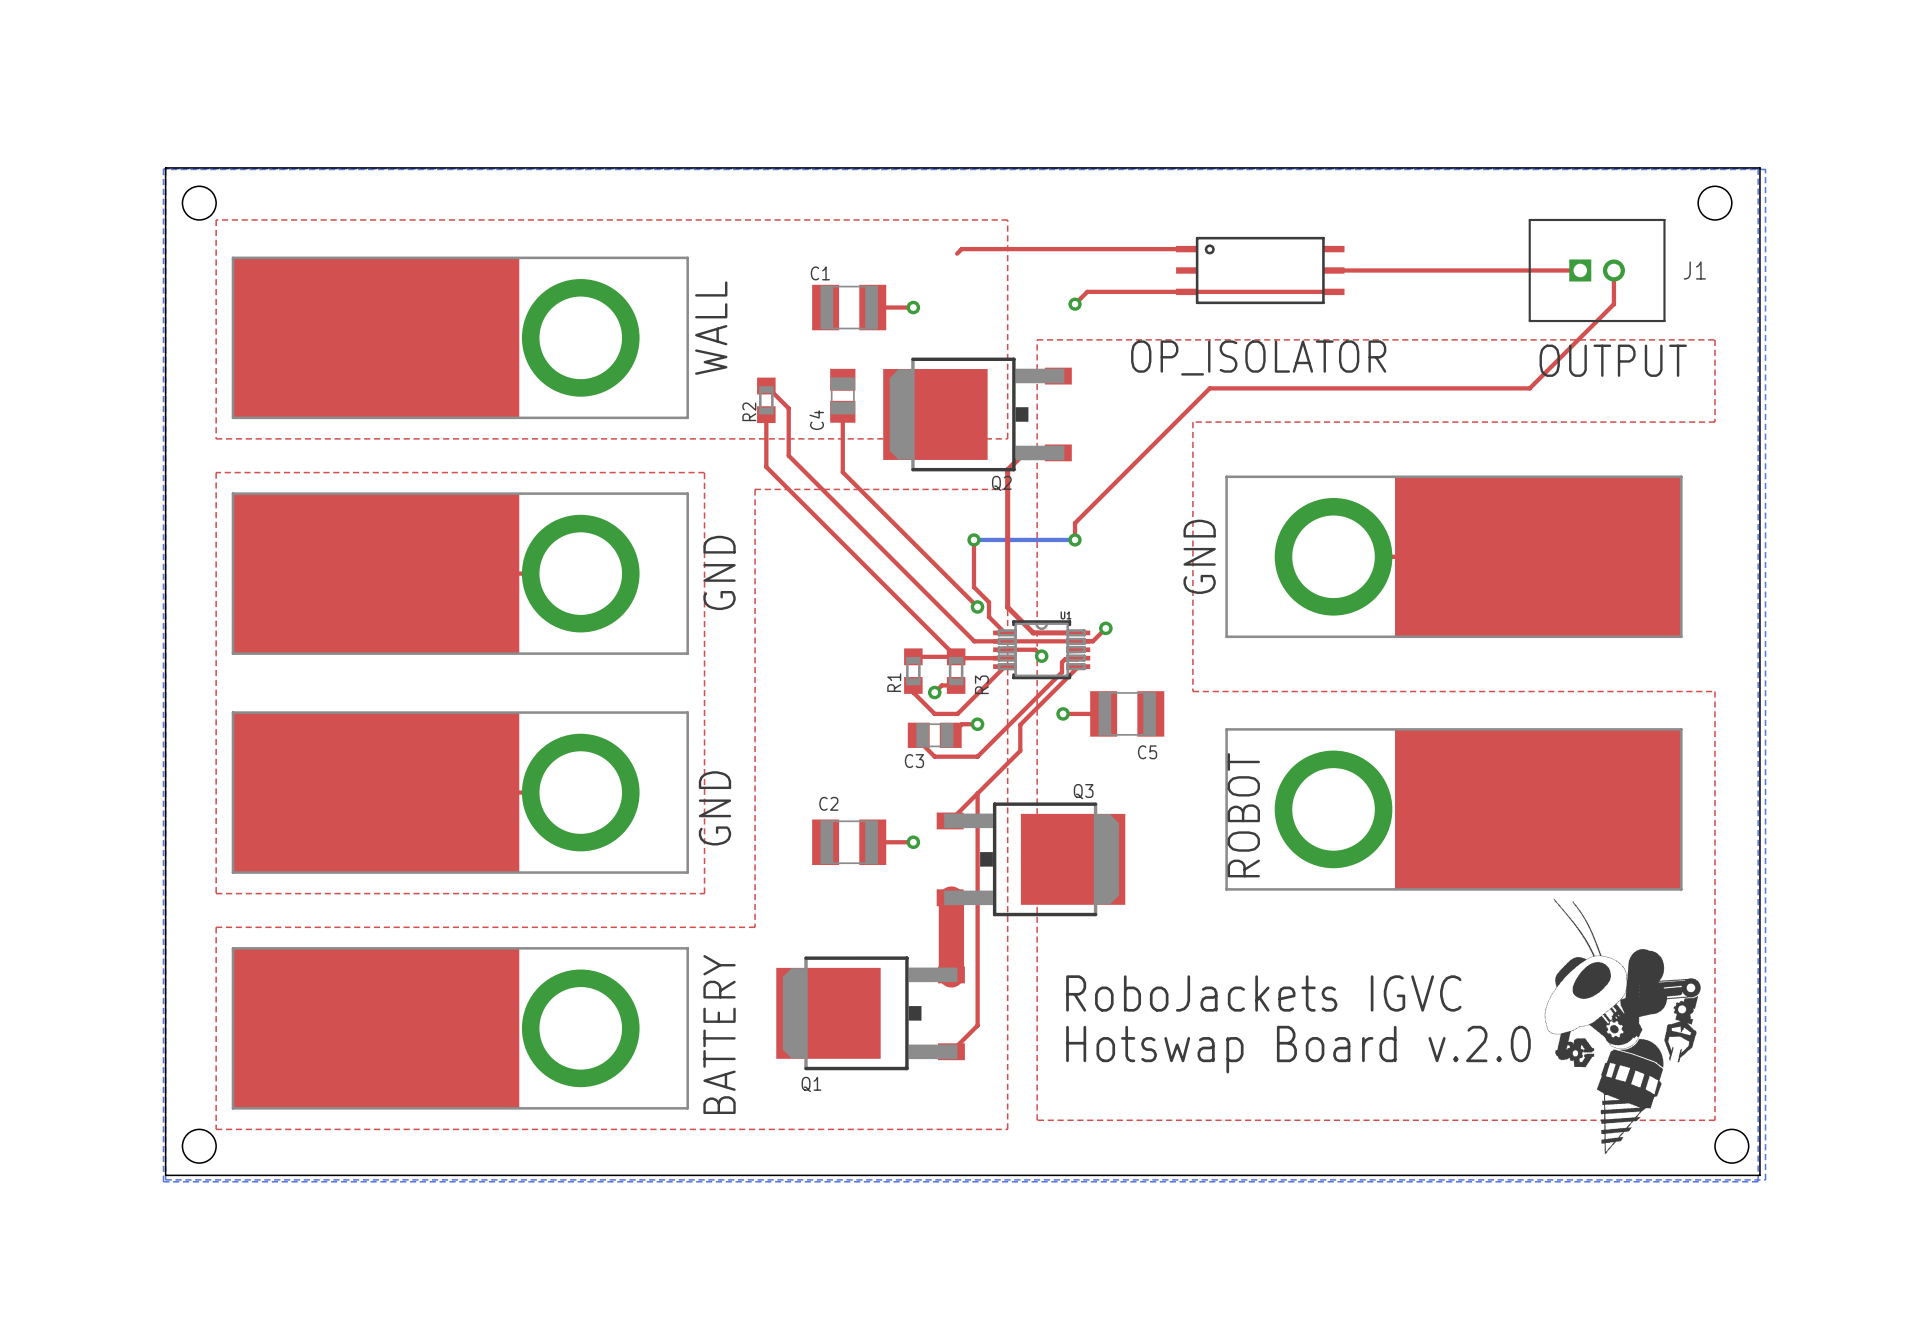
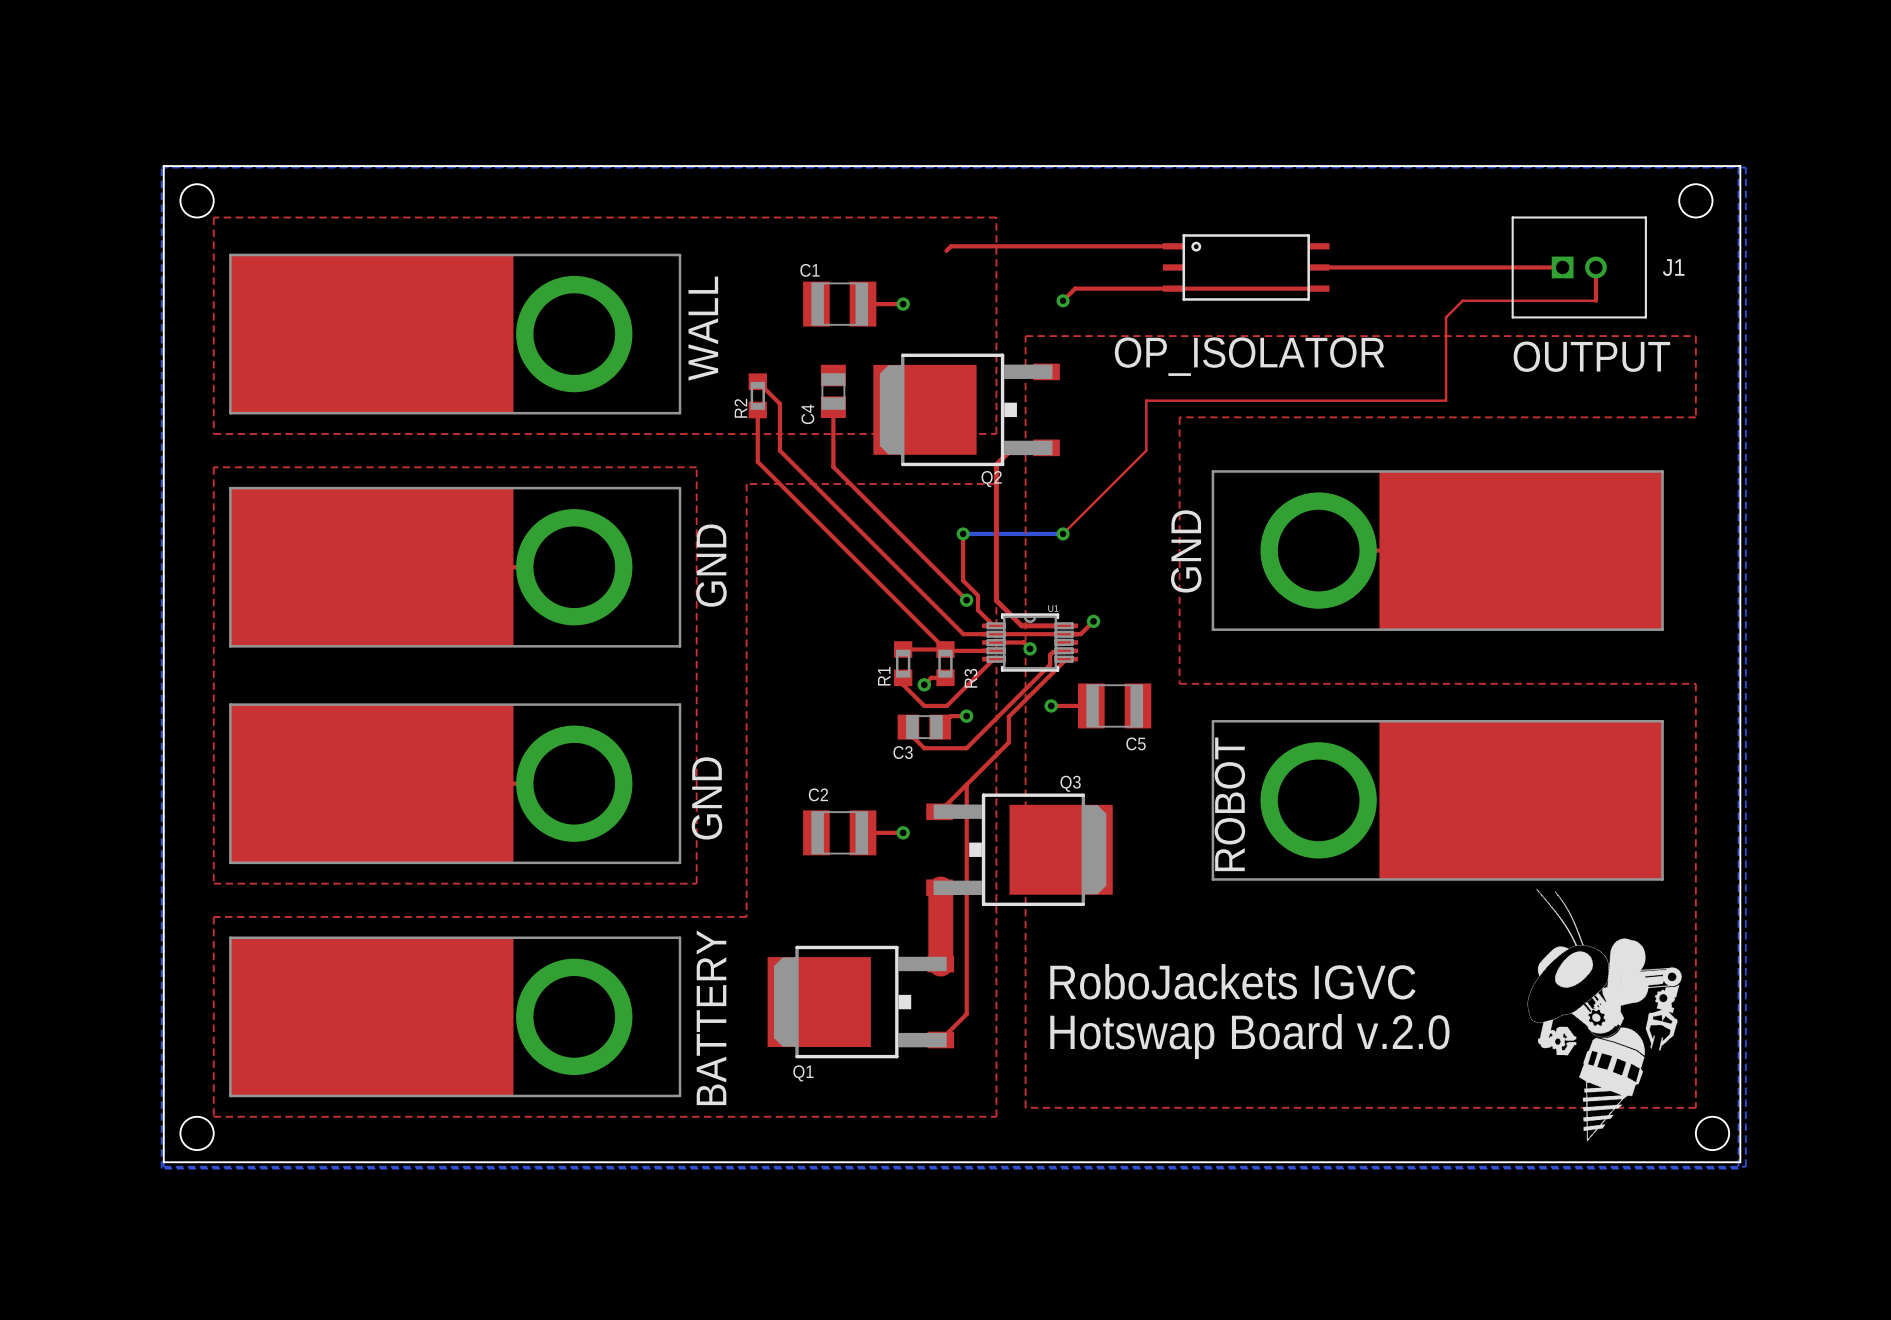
top track: (1613, 304) (1529, 388) (1209, 388) (1075, 523) (1075, 539) -> (1595, 300) (1462, 300) (1446, 317) (1446, 400) (1146, 400) (1146, 450) (1063, 533)

